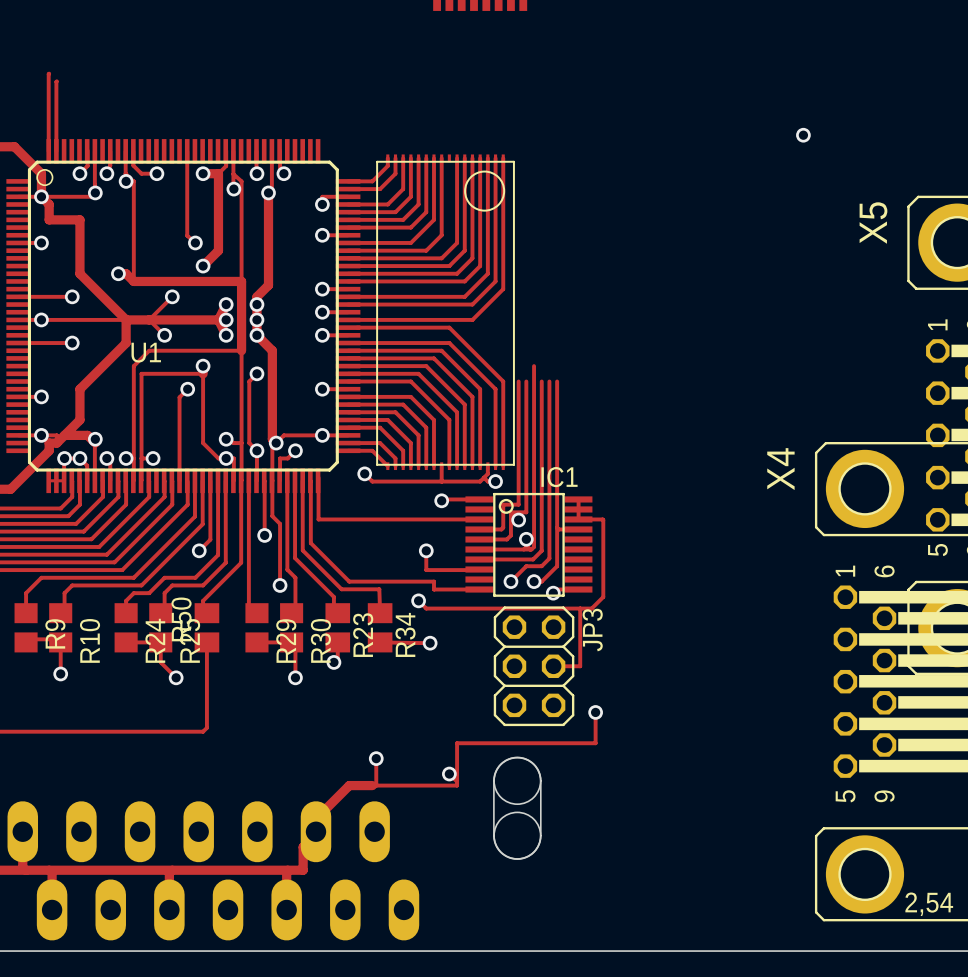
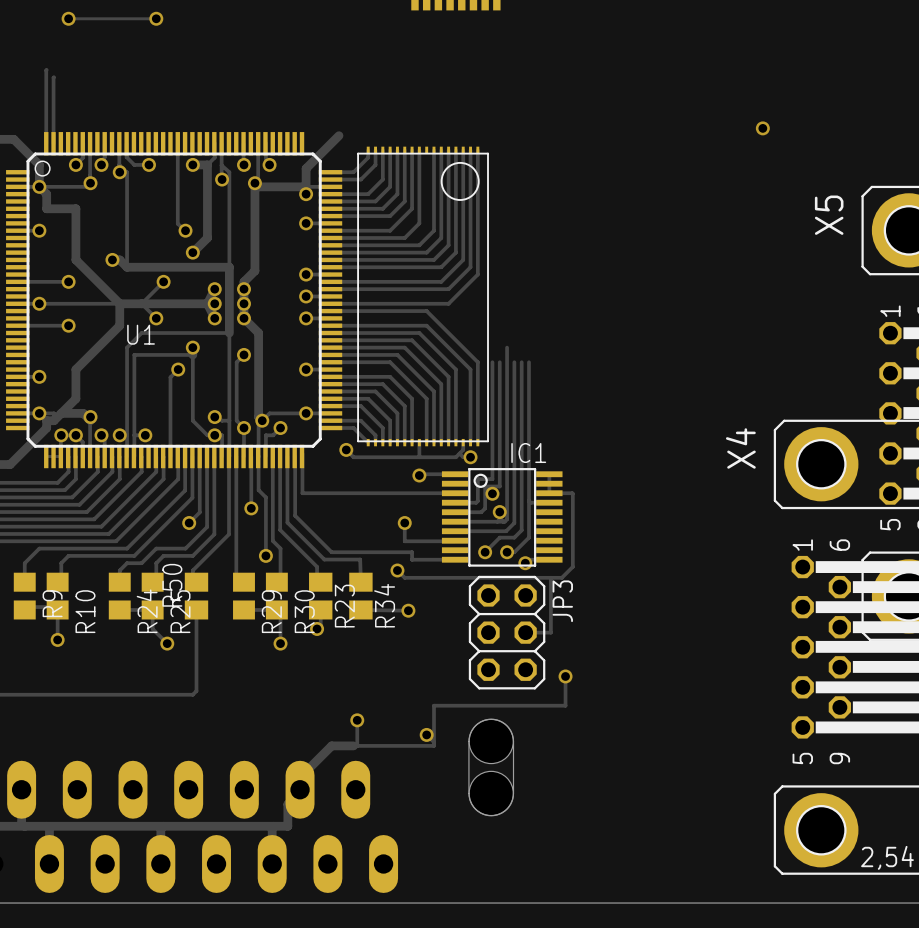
track: none -> (68, 18) (156, 18)
via: none -> (68, 18)
via: none -> (156, 18)
track: none -> (338, 135) (306, 168) (306, 186) (258, 186)

